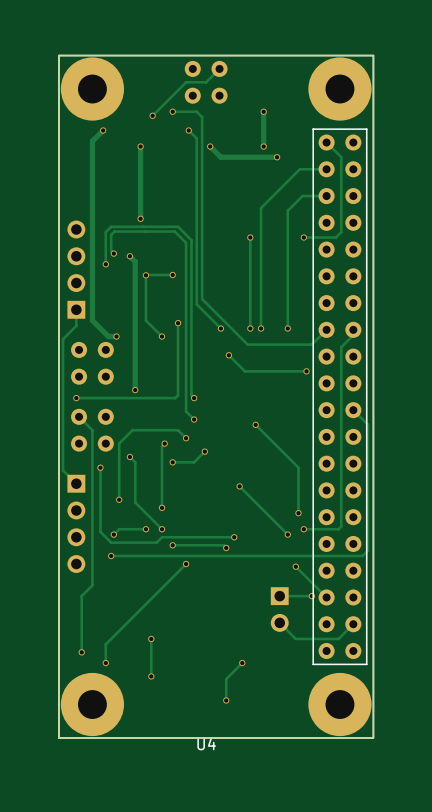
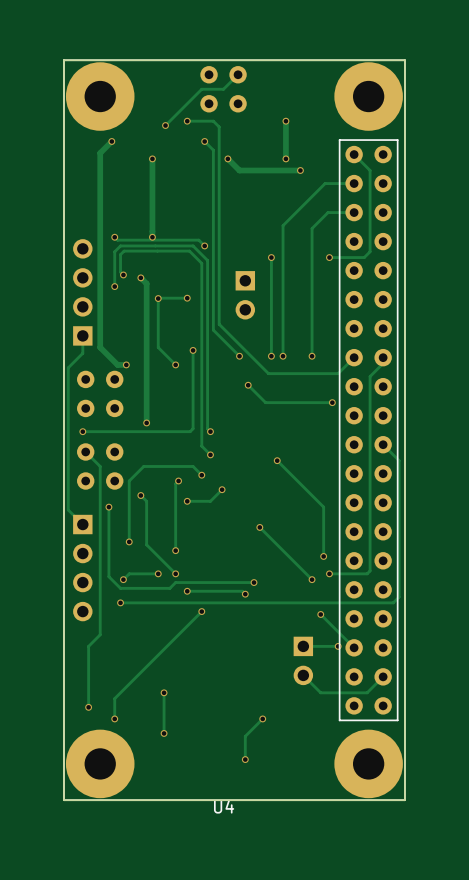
track: none -> (114, 237) (117, 240) (198, 240) (204, 245)
via: none -> (114, 237)
via: none -> (204, 245)
part: none -> (245, 295)

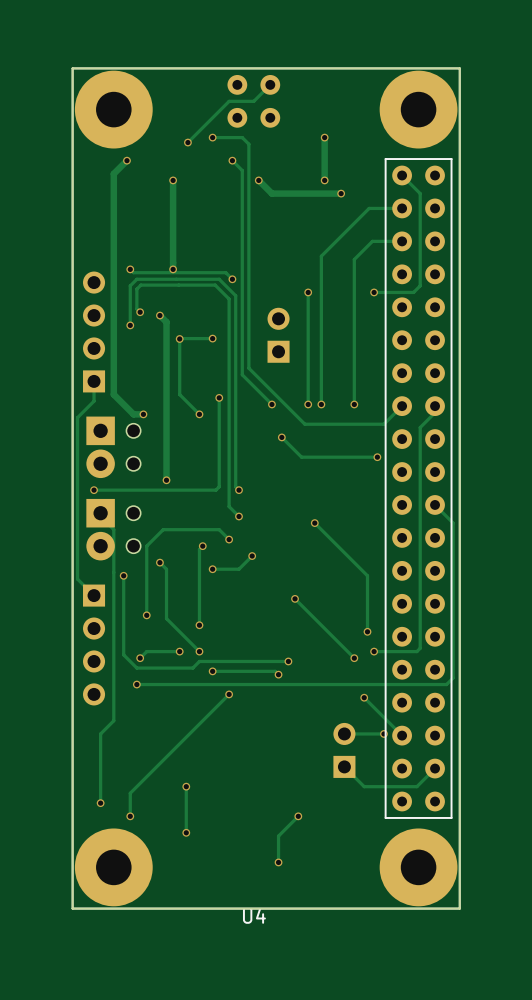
part rotation: 0° (245, 295) -> 180° (278, 335)
part footprint: [77, 370, 124, 418] -> [86, 416, 141, 479]
part footprint: [77, 443, 124, 490] -> [86, 498, 141, 561]
part rotation: 0° (303, 660) -> 180° (344, 750)

